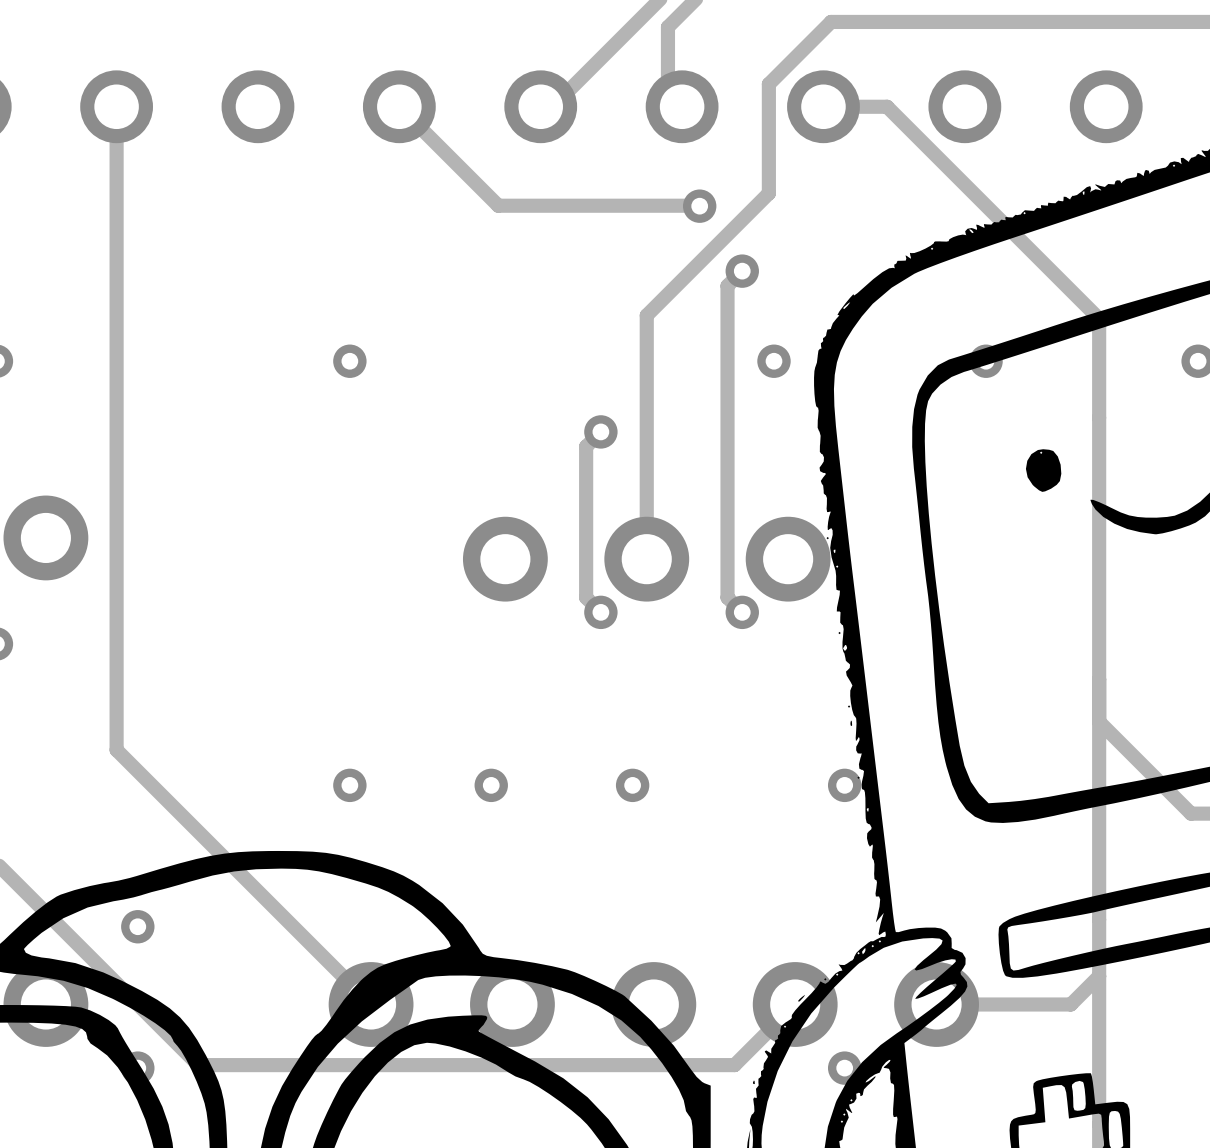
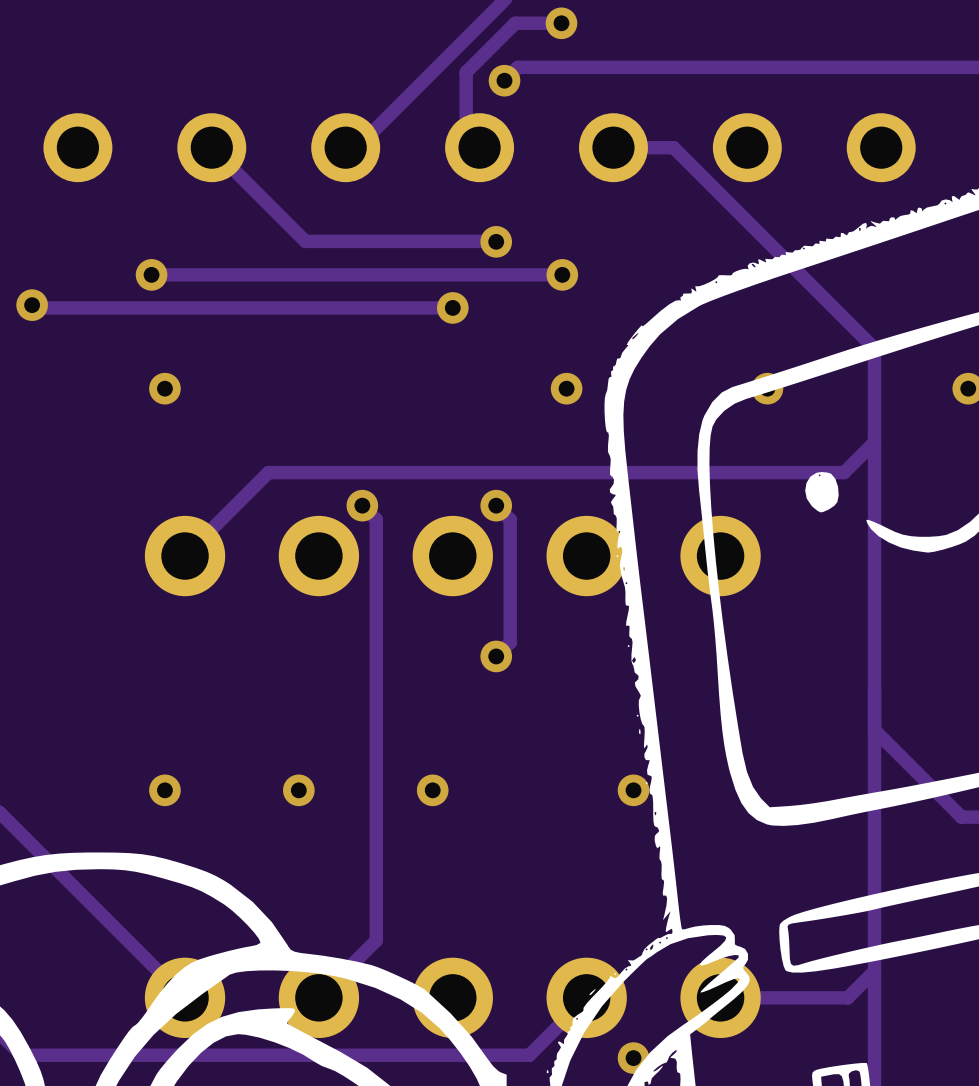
track: (831, 21) (768, 84) (768, 193) (646, 315) (646, 559) -> (620, 67) (517, 67) (504, 80) (506, 80)
via: none -> (504, 80)
via: none -> (151, 274)
track: none -> (562, 274) (151, 274)
track: (742, 271) (727, 285) (727, 597) (742, 612) -> none
via position: (742, 271) -> (562, 274)
track: none -> (32, 305) (34, 307) (452, 307)
via: none -> (32, 305)
via: none -> (452, 307)
track: none -> (874, 442) (844, 472) (268, 472) (185, 556)
track: (600, 431) (586, 446) (586, 597) (600, 612) -> none
via: (600, 431) -> none
track: none -> (362, 505) (376, 519) (376, 940) (318, 997)
via: none -> (362, 505)
track: none -> (496, 505) (510, 519) (510, 642) (496, 656)
via: none -> (496, 505)
part footprint: [462, 516, 831, 602] -> [144, 515, 761, 597]
via: (600, 612) -> none
via: (742, 612) -> none
via: none -> (496, 656)

